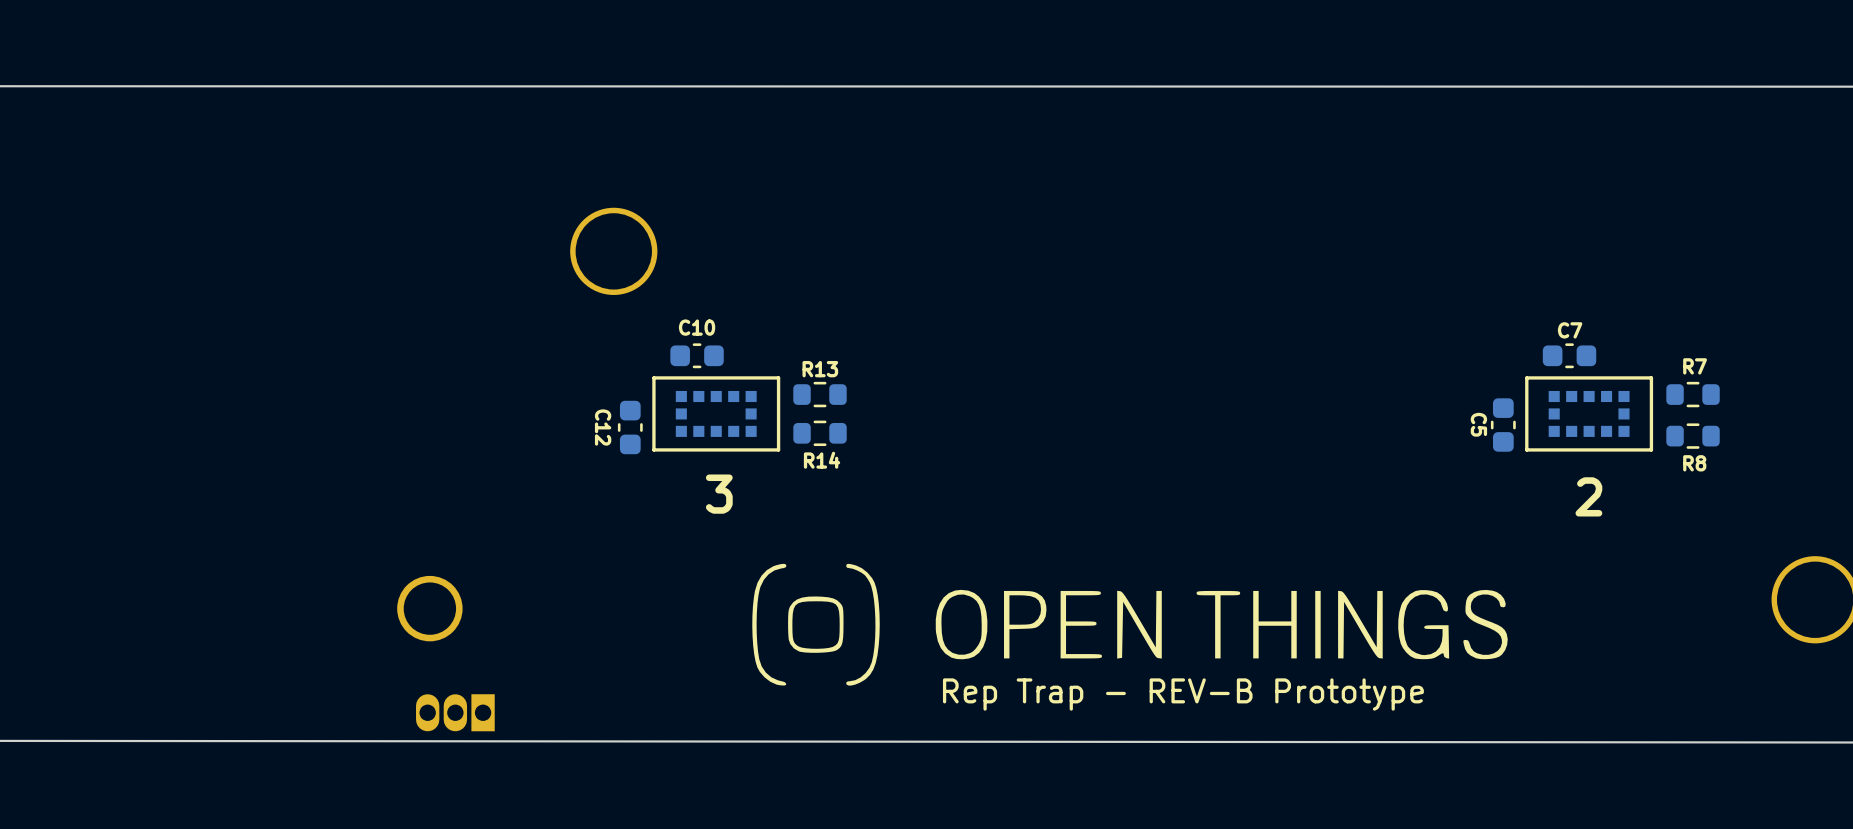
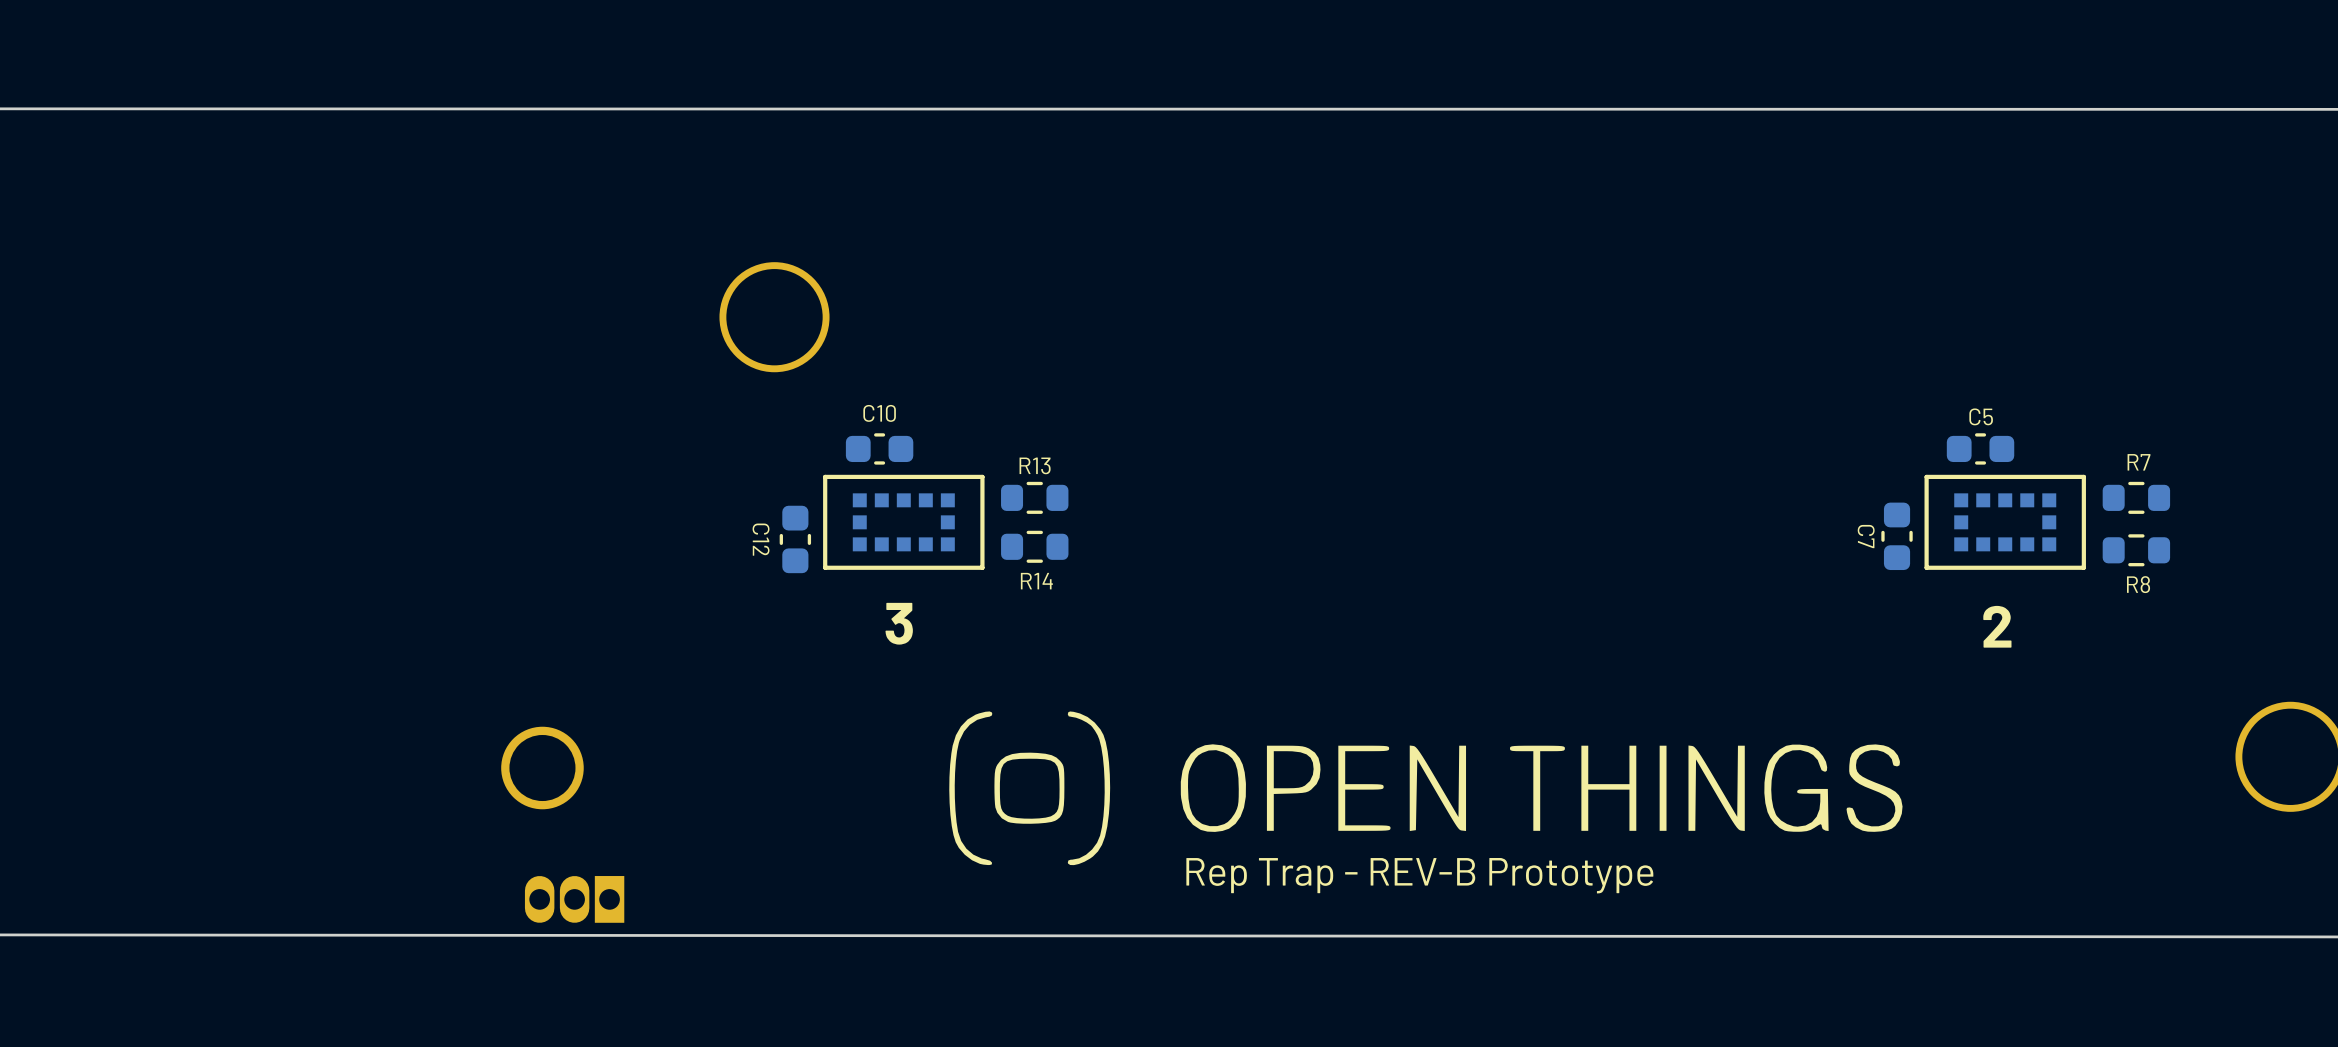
C7 name: C7 (1570, 330) -> C5 (1981, 416)
C5 name: C5 (1478, 424) -> C7 (1866, 536)

